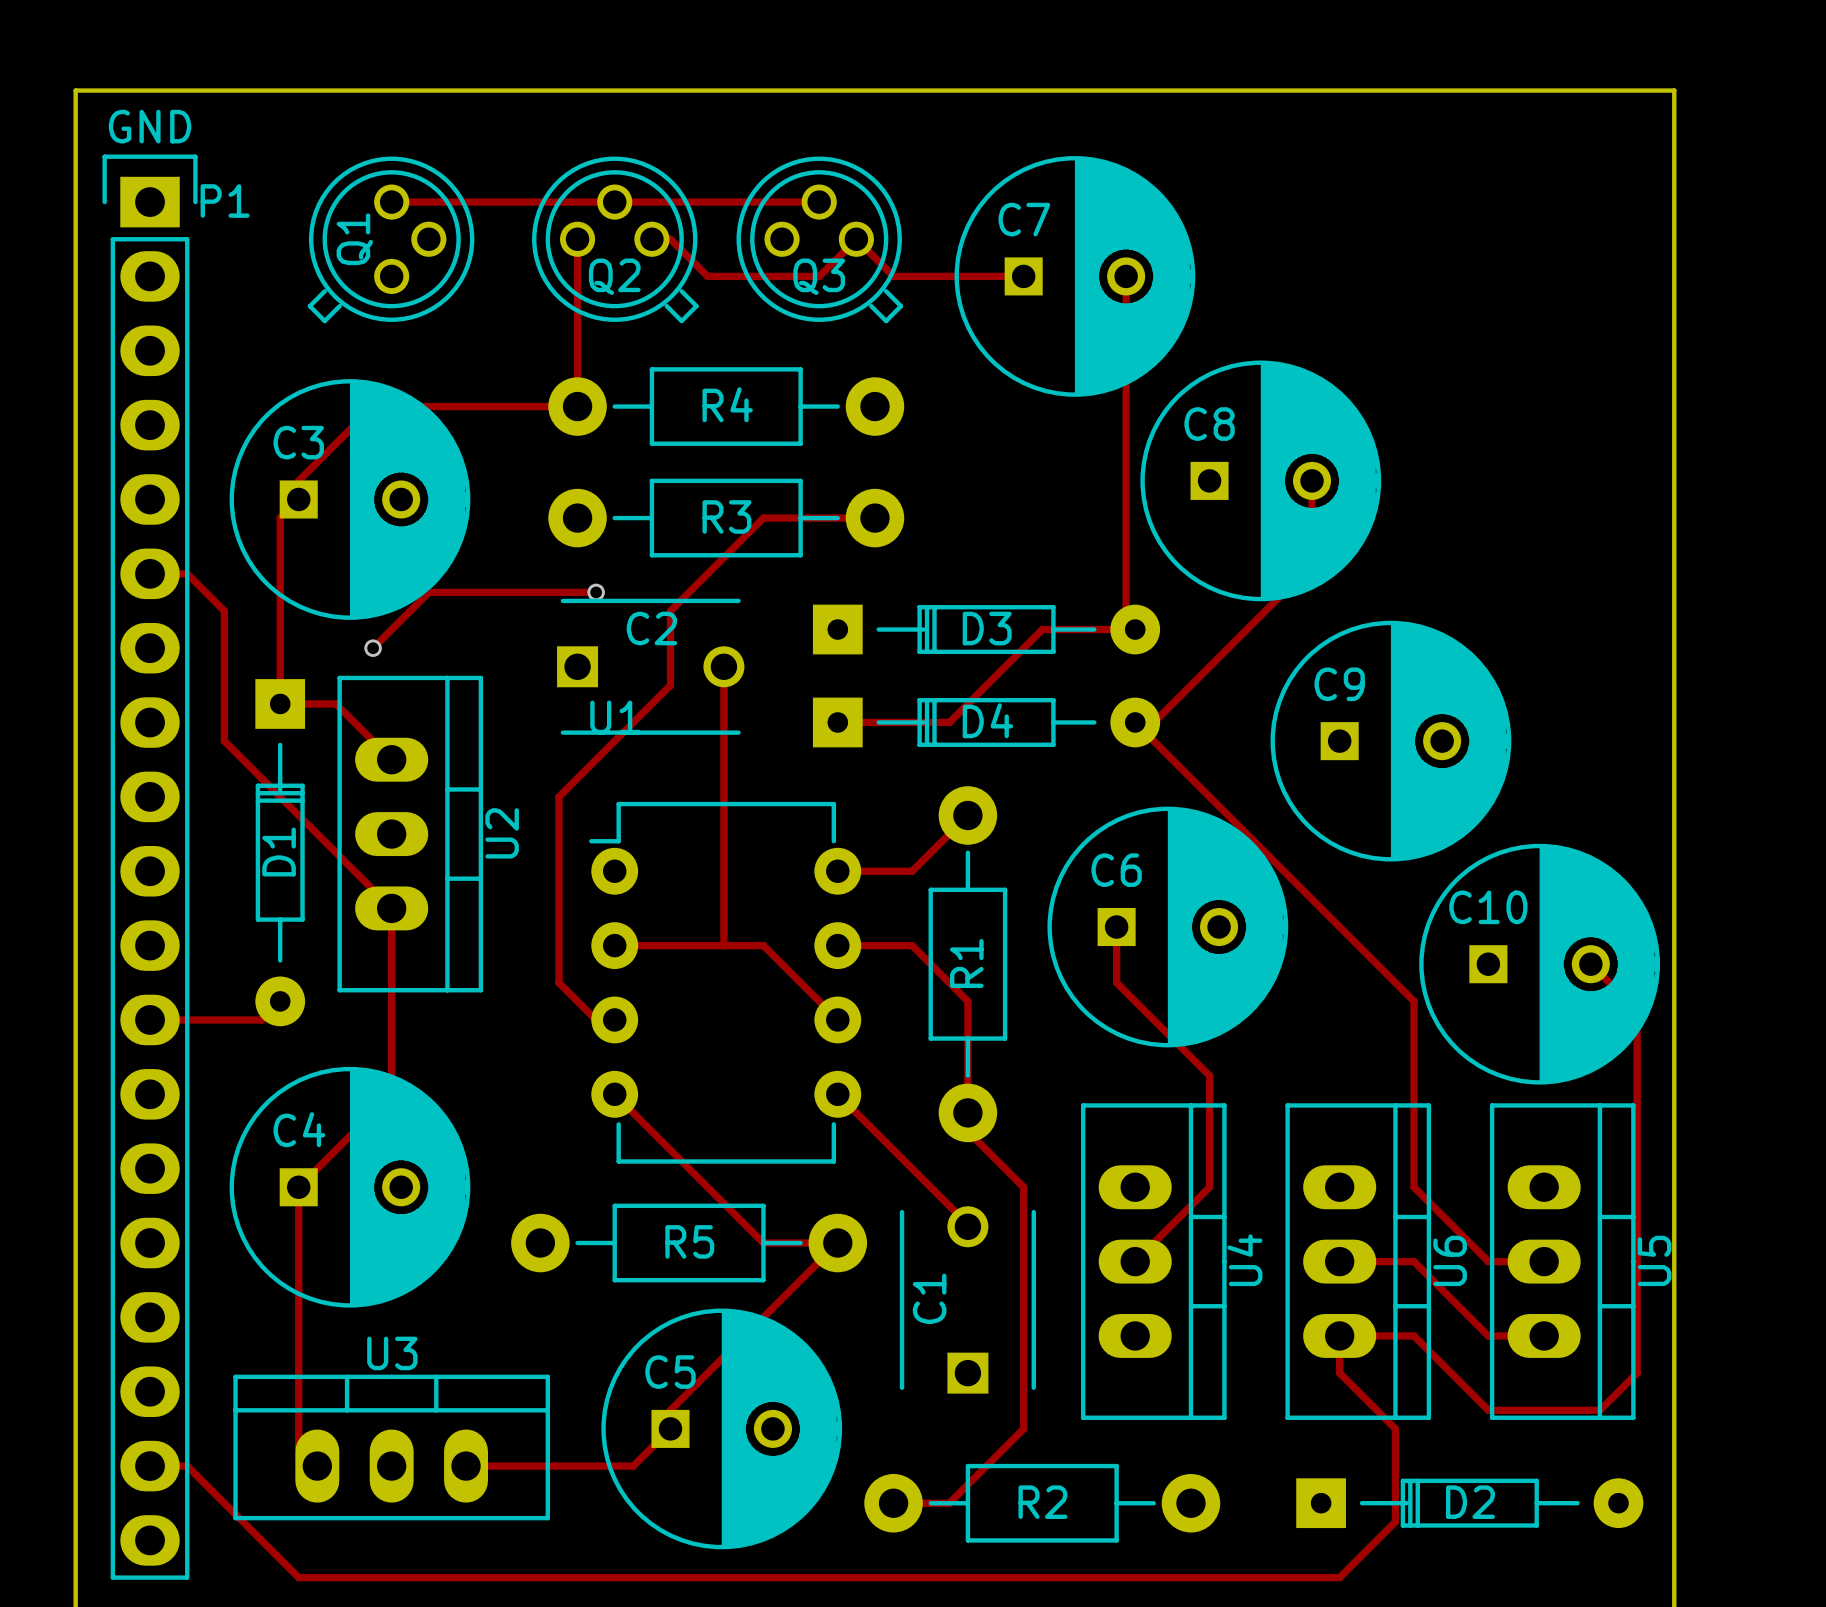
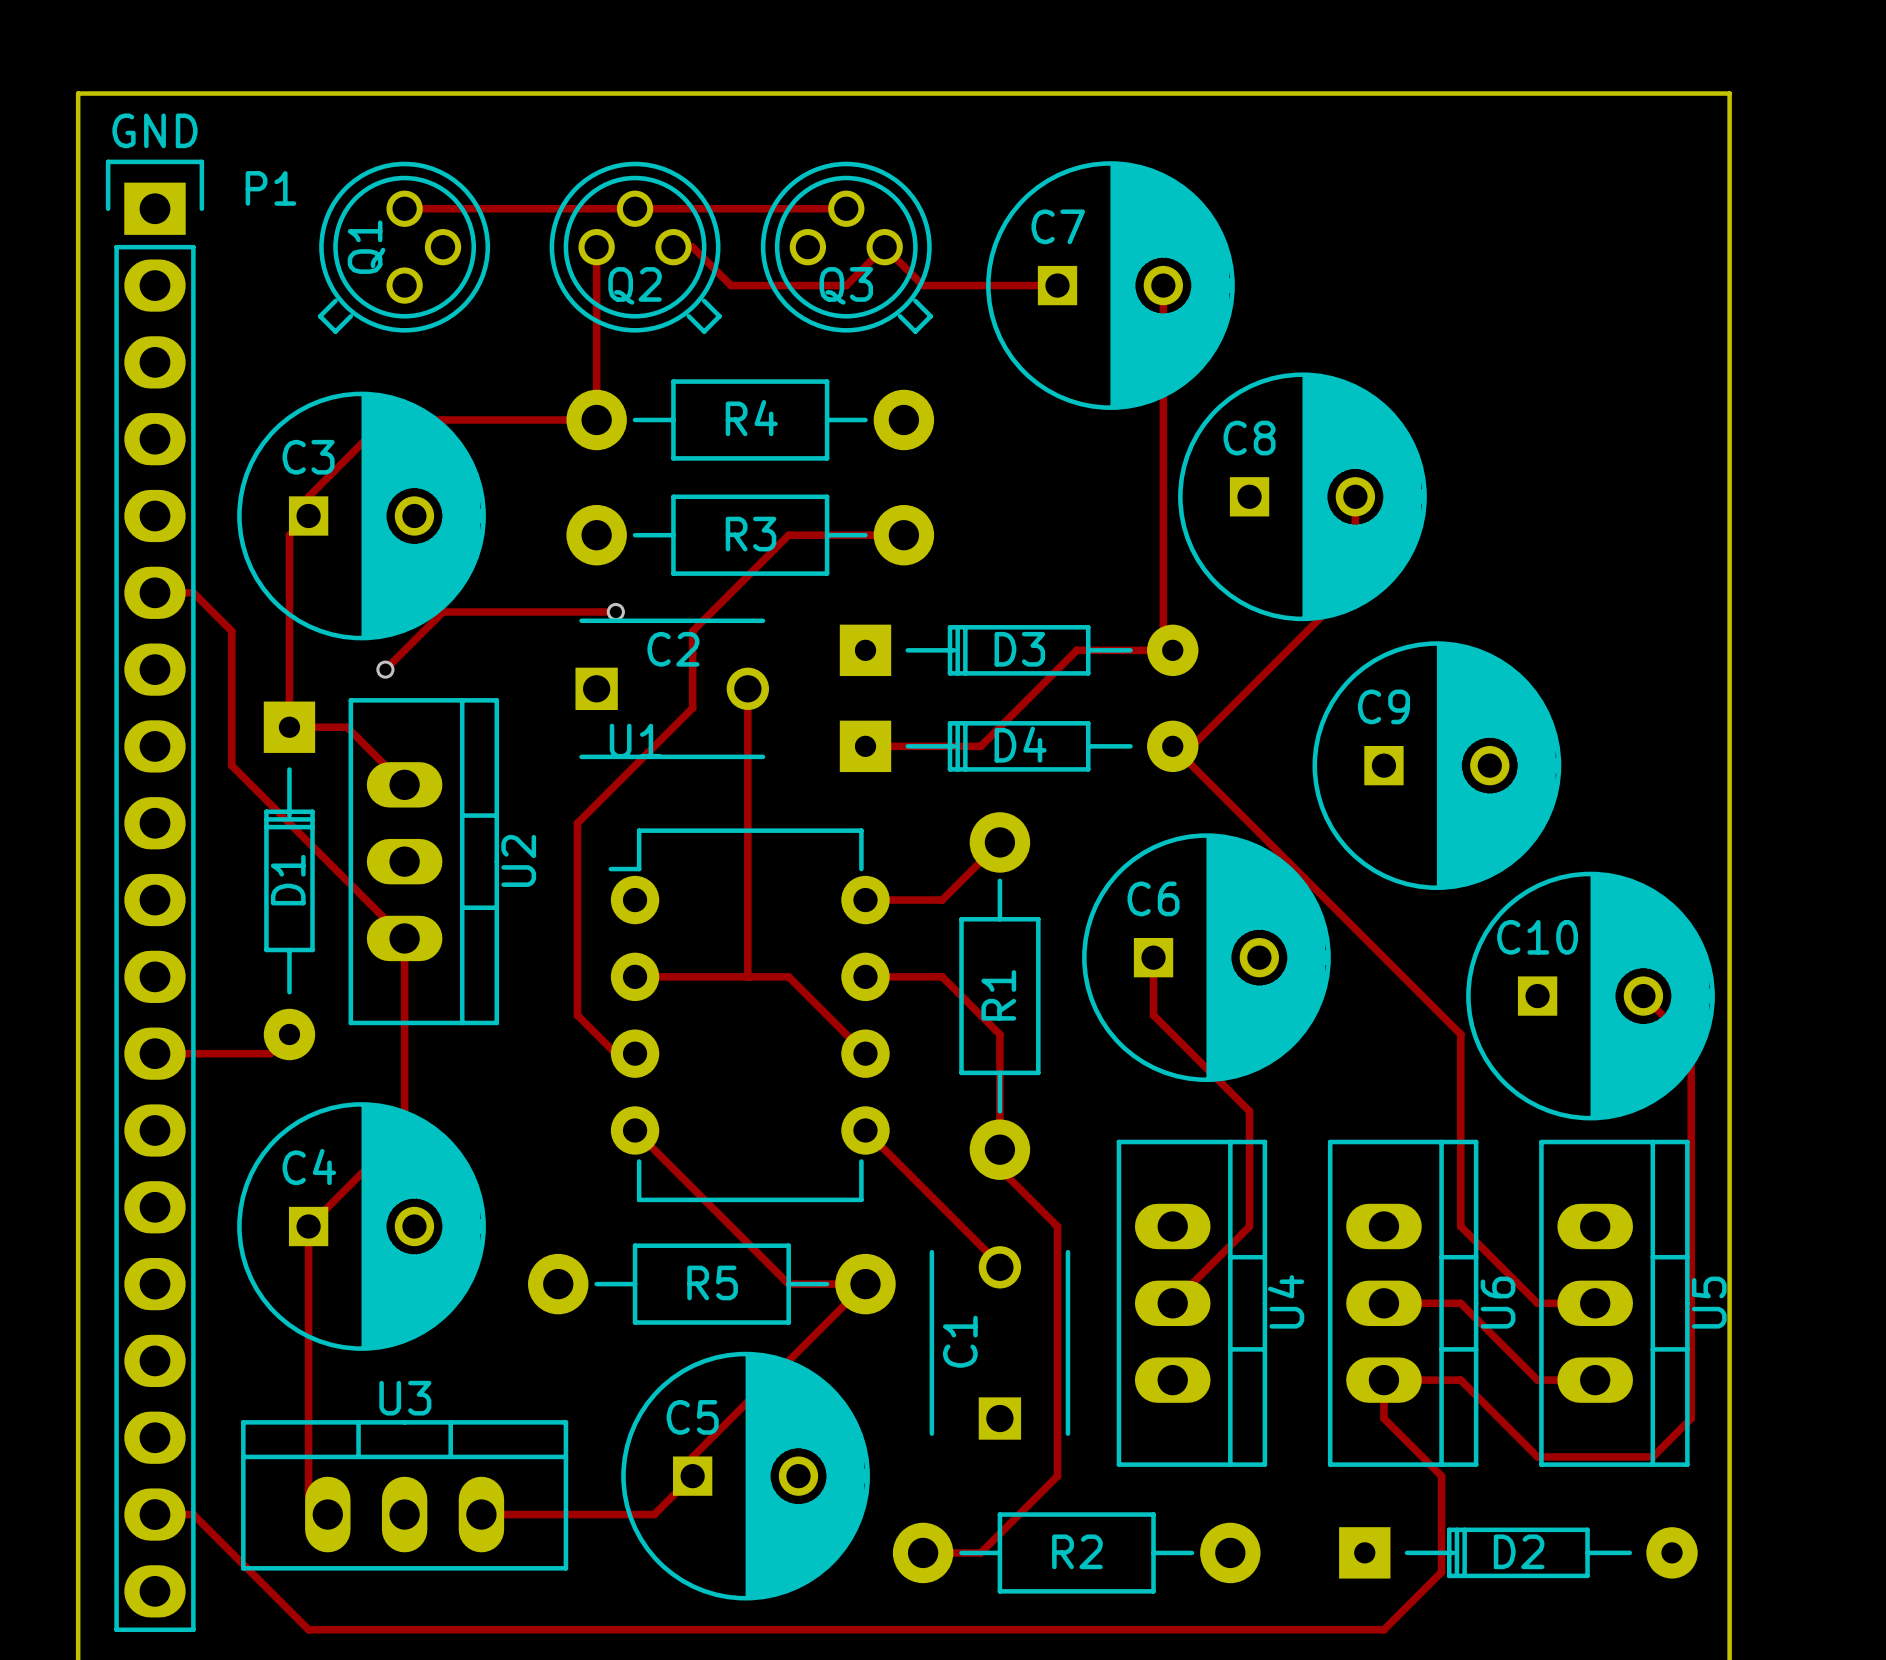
P1 name position: P1 (225, 200) -> P1 (270, 188)

